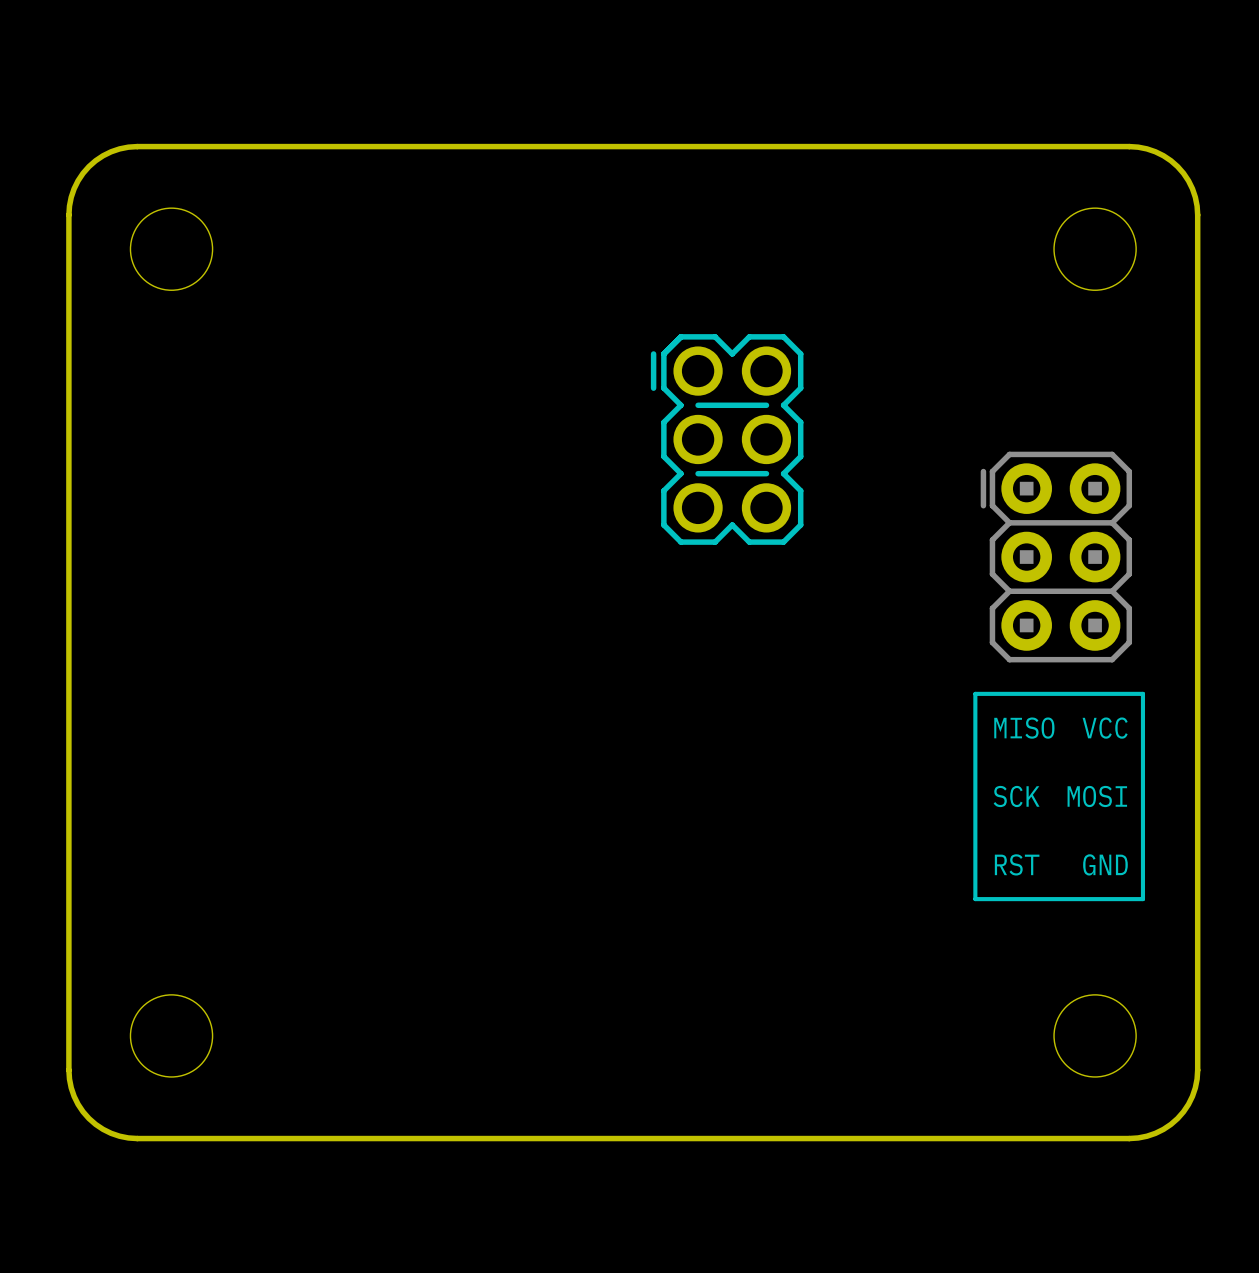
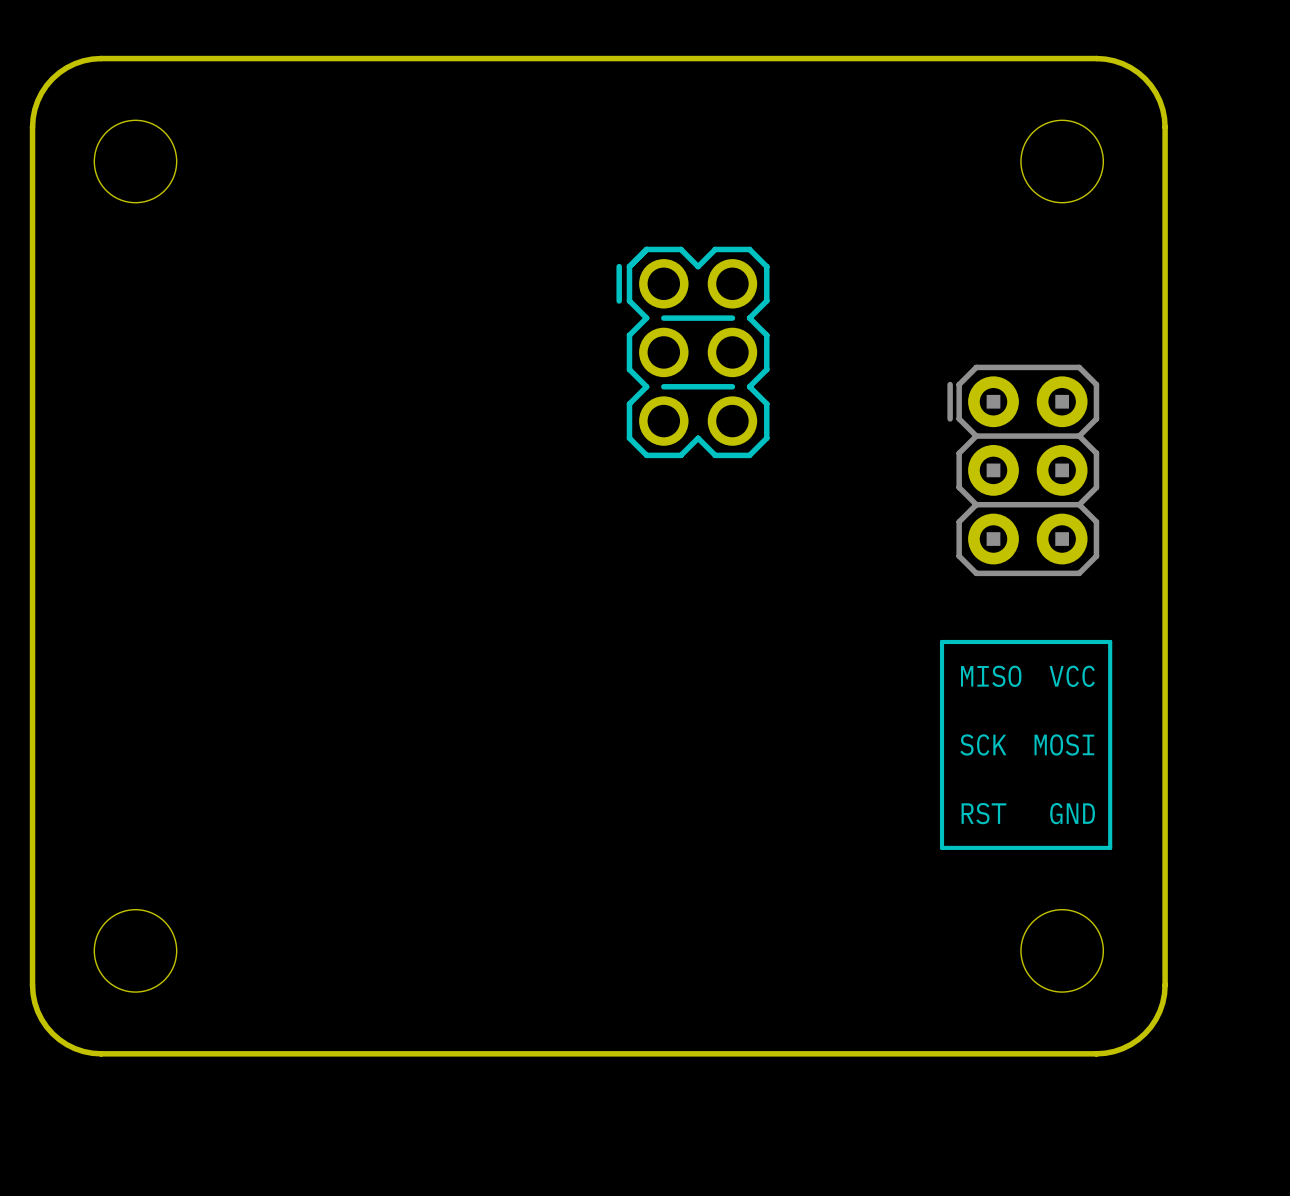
line: (975, 728) (975, 693) (1142, 693) (1142, 728) -> (942, 641) (1110, 641)
text position: MISO (1024, 728) -> MISO (991, 676)
text position: VCC (1105, 728) -> VCC (1072, 676)
text position: SCK (1016, 796) -> SCK (983, 744)
text position: MOSI (1097, 796) -> MOSI (1064, 744)
text position: RST (1017, 864) -> RST (983, 813)
text position: GND (1105, 864) -> GND (1072, 813)
line: (975, 899) (1142, 899) -> (942, 813) (942, 847) (1110, 847) (1110, 813)

